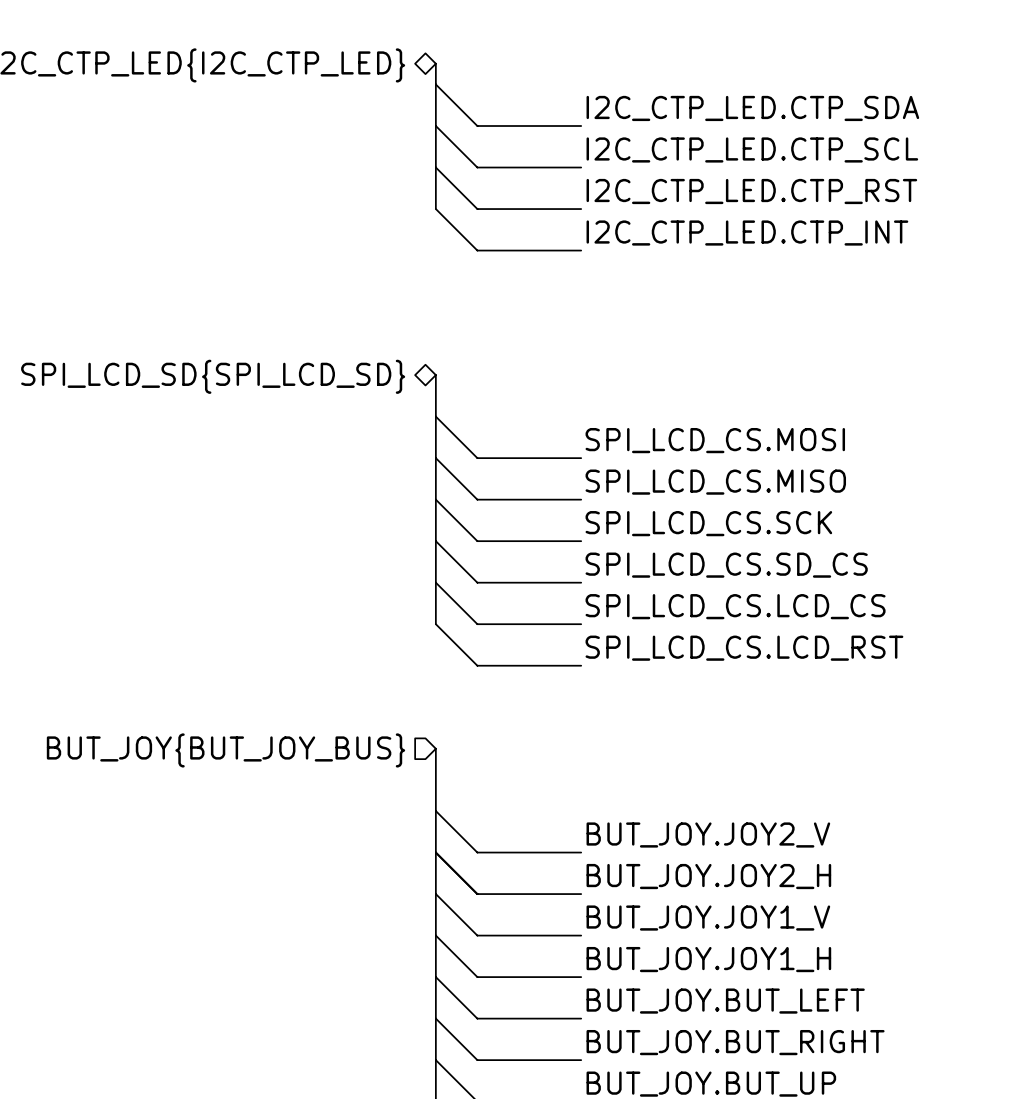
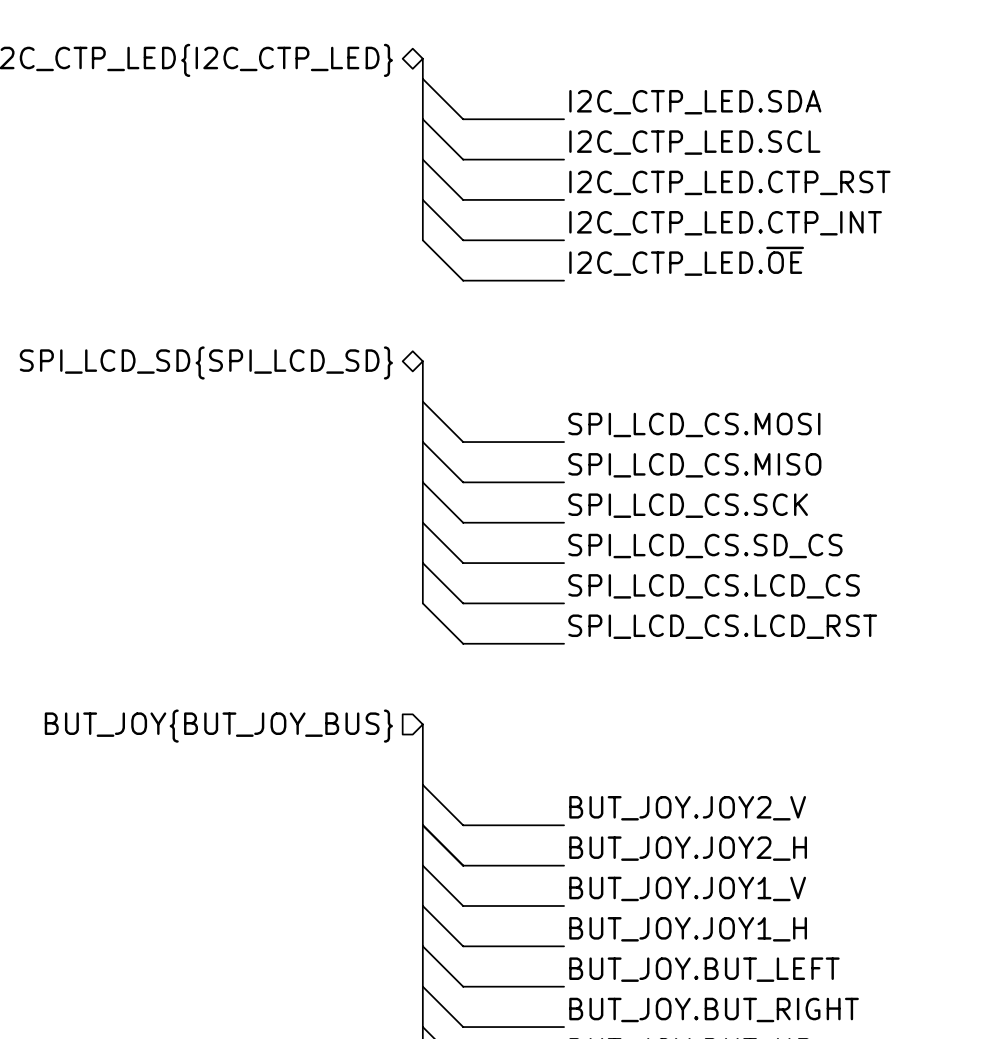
label: I2C_CTP_LED.CTP_SDA (752, 108) -> I2C_CTP_LED.SDA (695, 102)
label: I2C_CTP_LED.CTP_SCL (752, 149) -> I2C_CTP_LED.SCL (694, 142)
bus: none -> (422, 199) (422, 240)
wire: none -> (422, 240) (463, 280) (564, 280)
label: none -> I2C_CTP_LED.~{OE} (686, 261)

